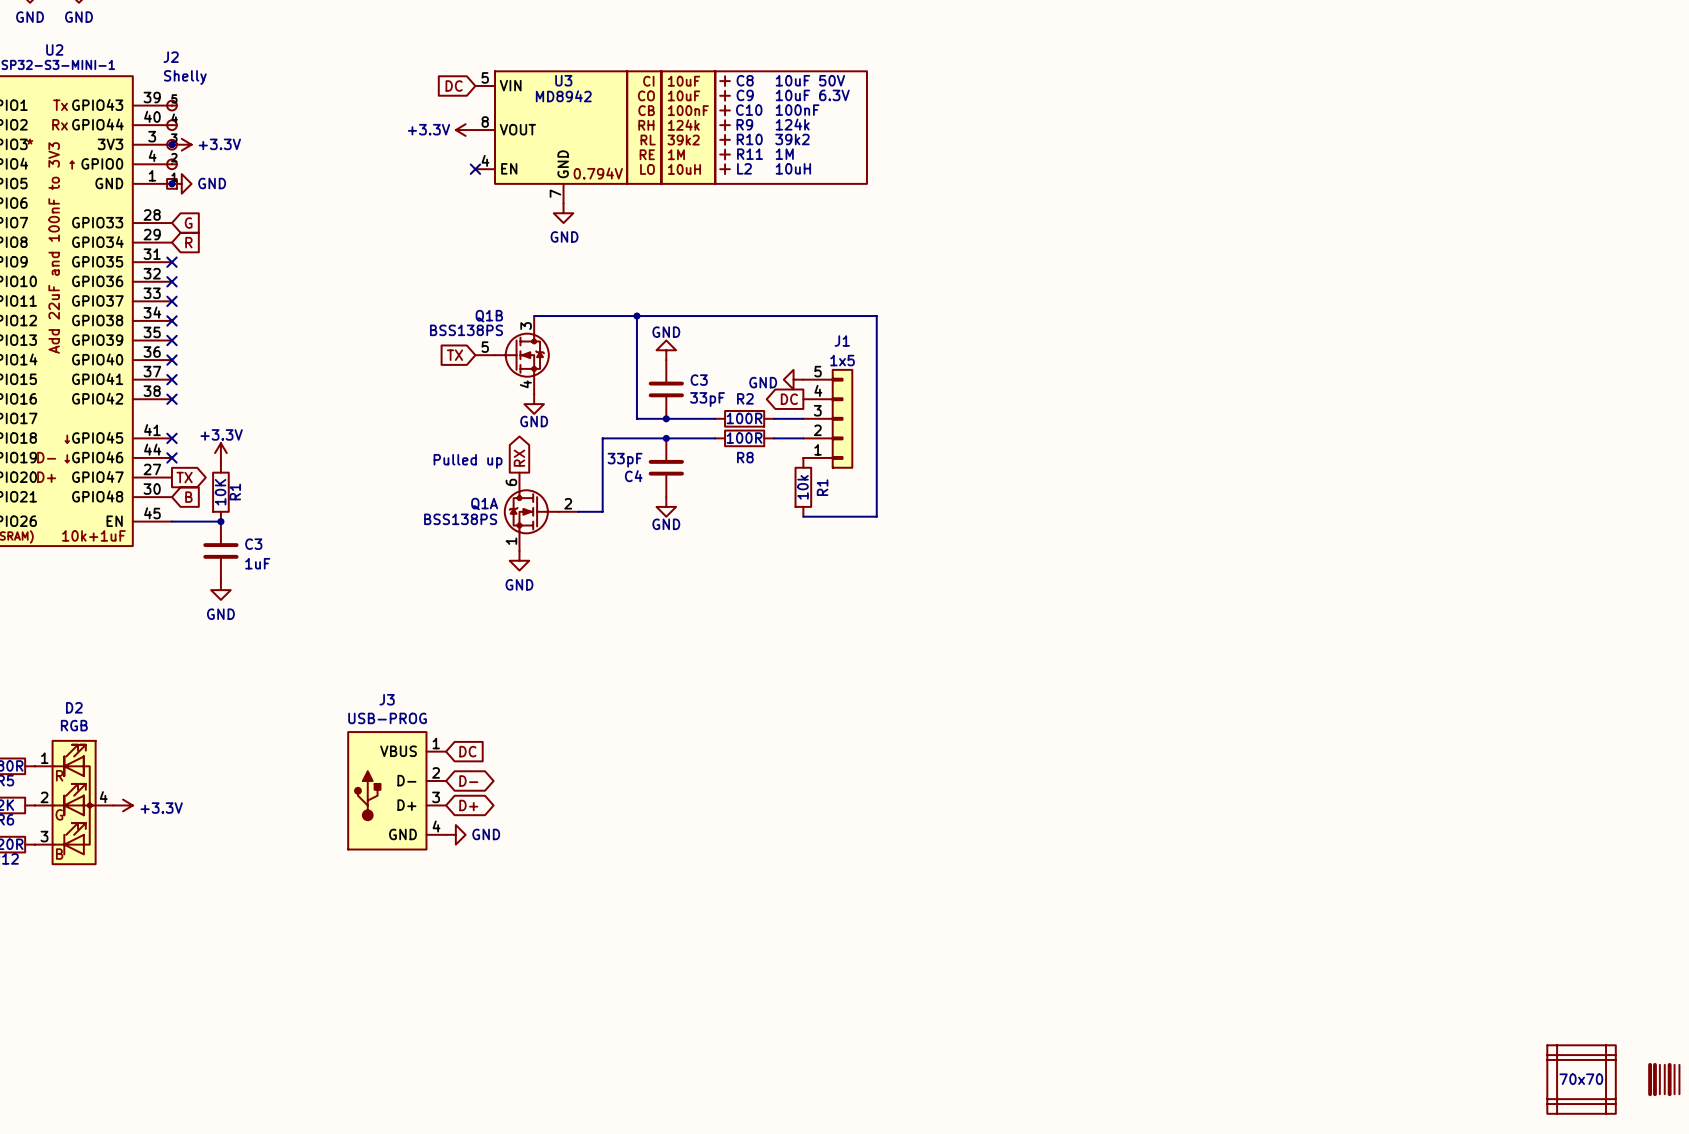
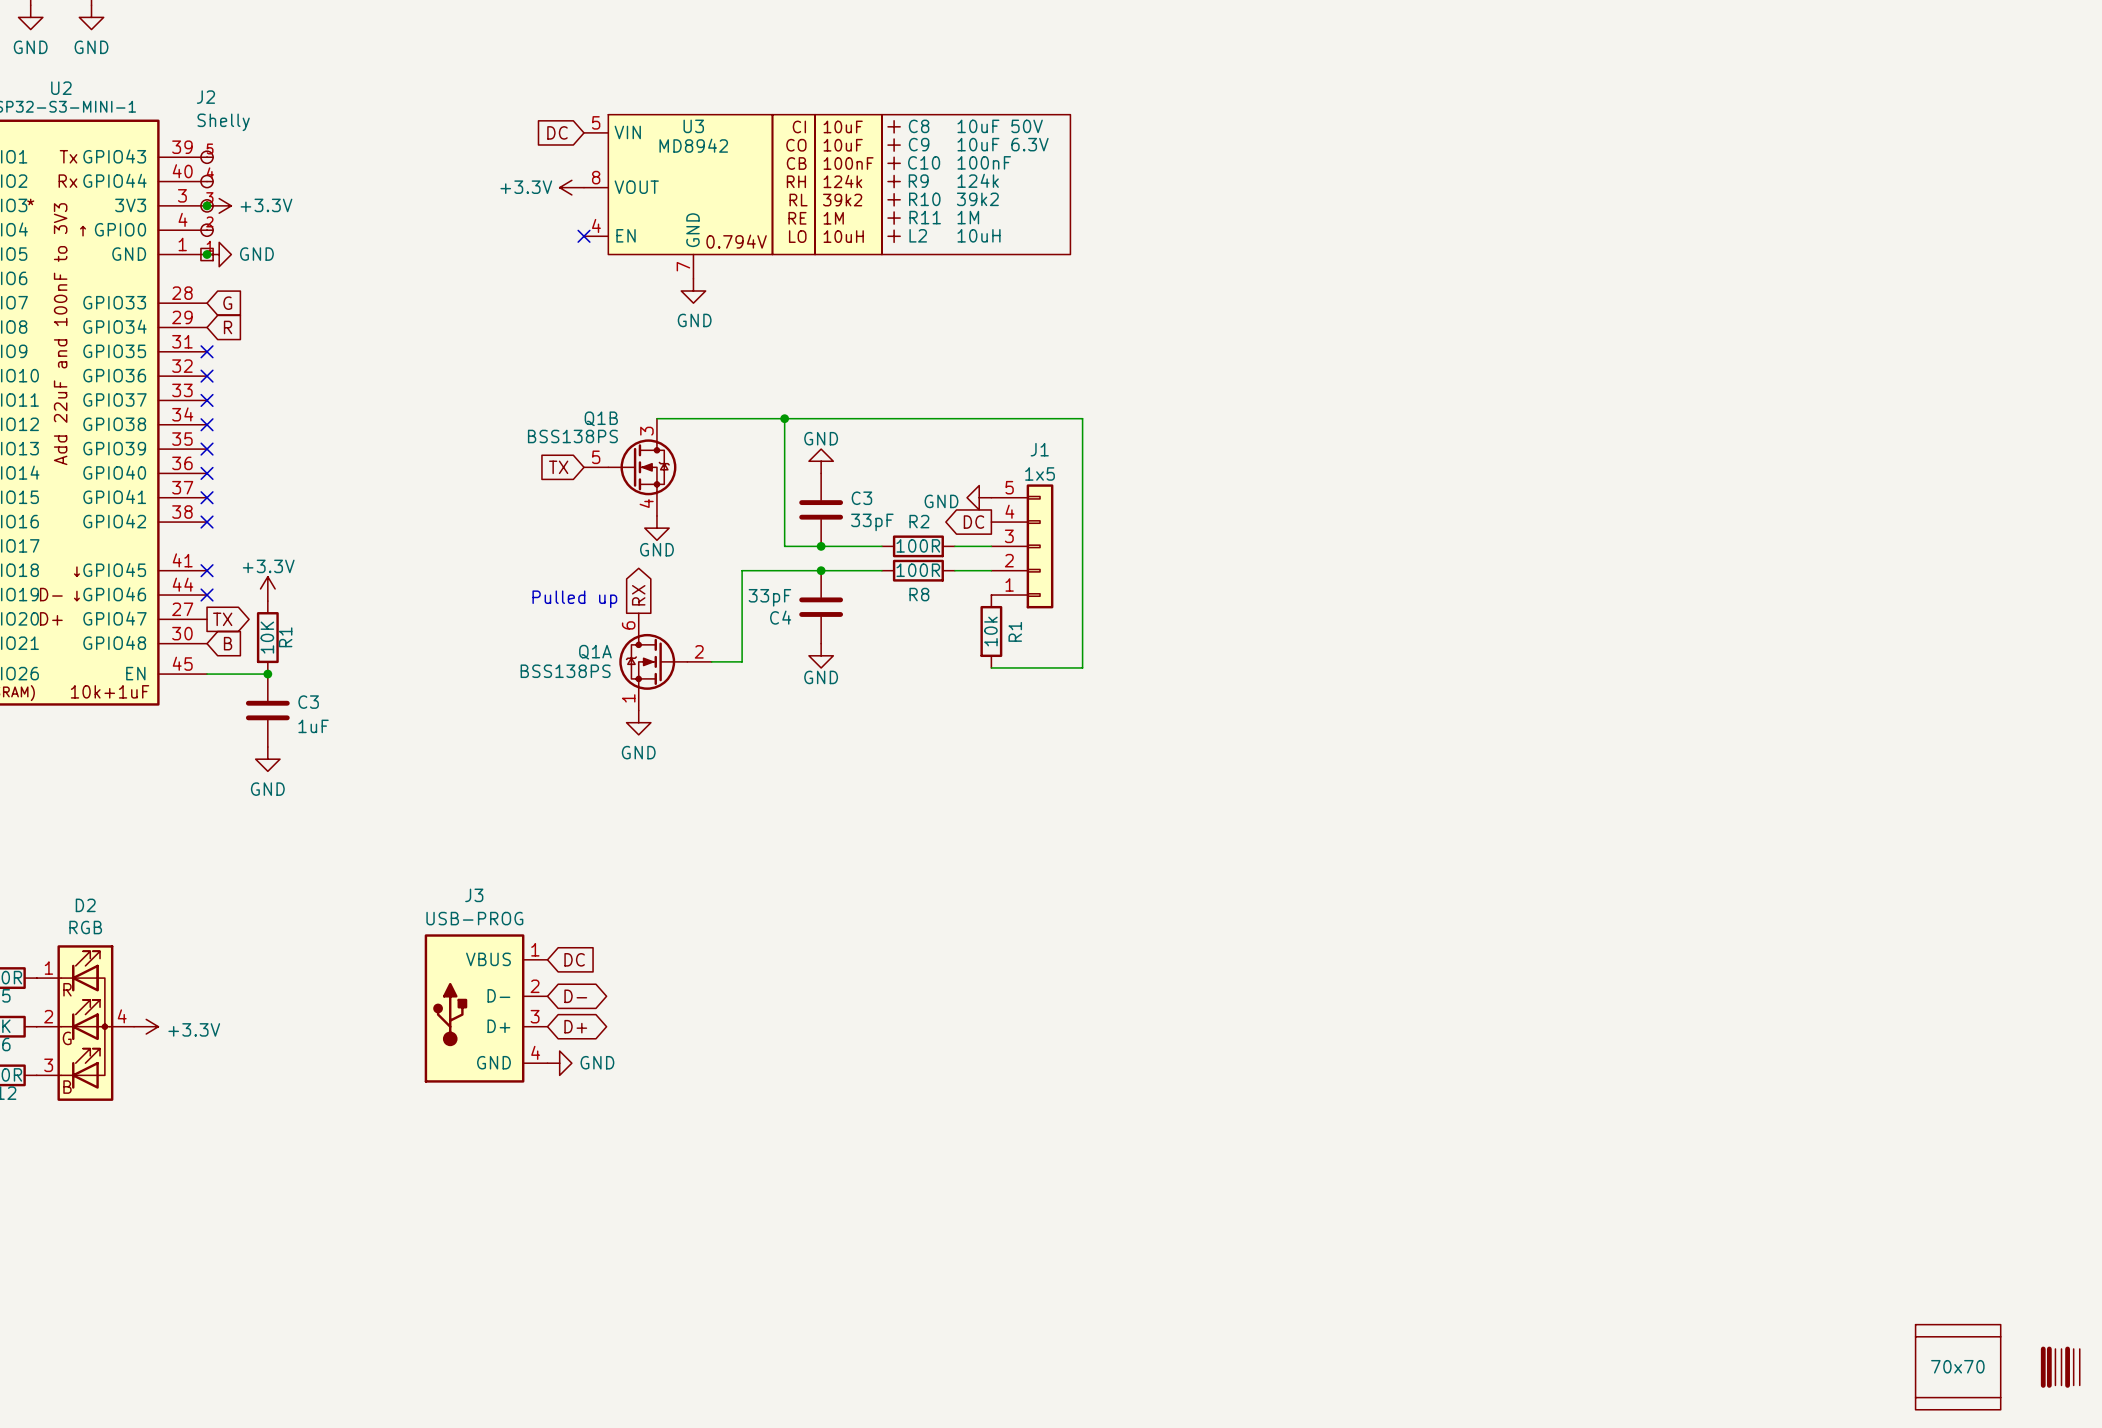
part: (1581, 1059) -> none
part: (1557, 1079) -> none
part: (1606, 1079) -> none
part: (1581, 1099) -> none

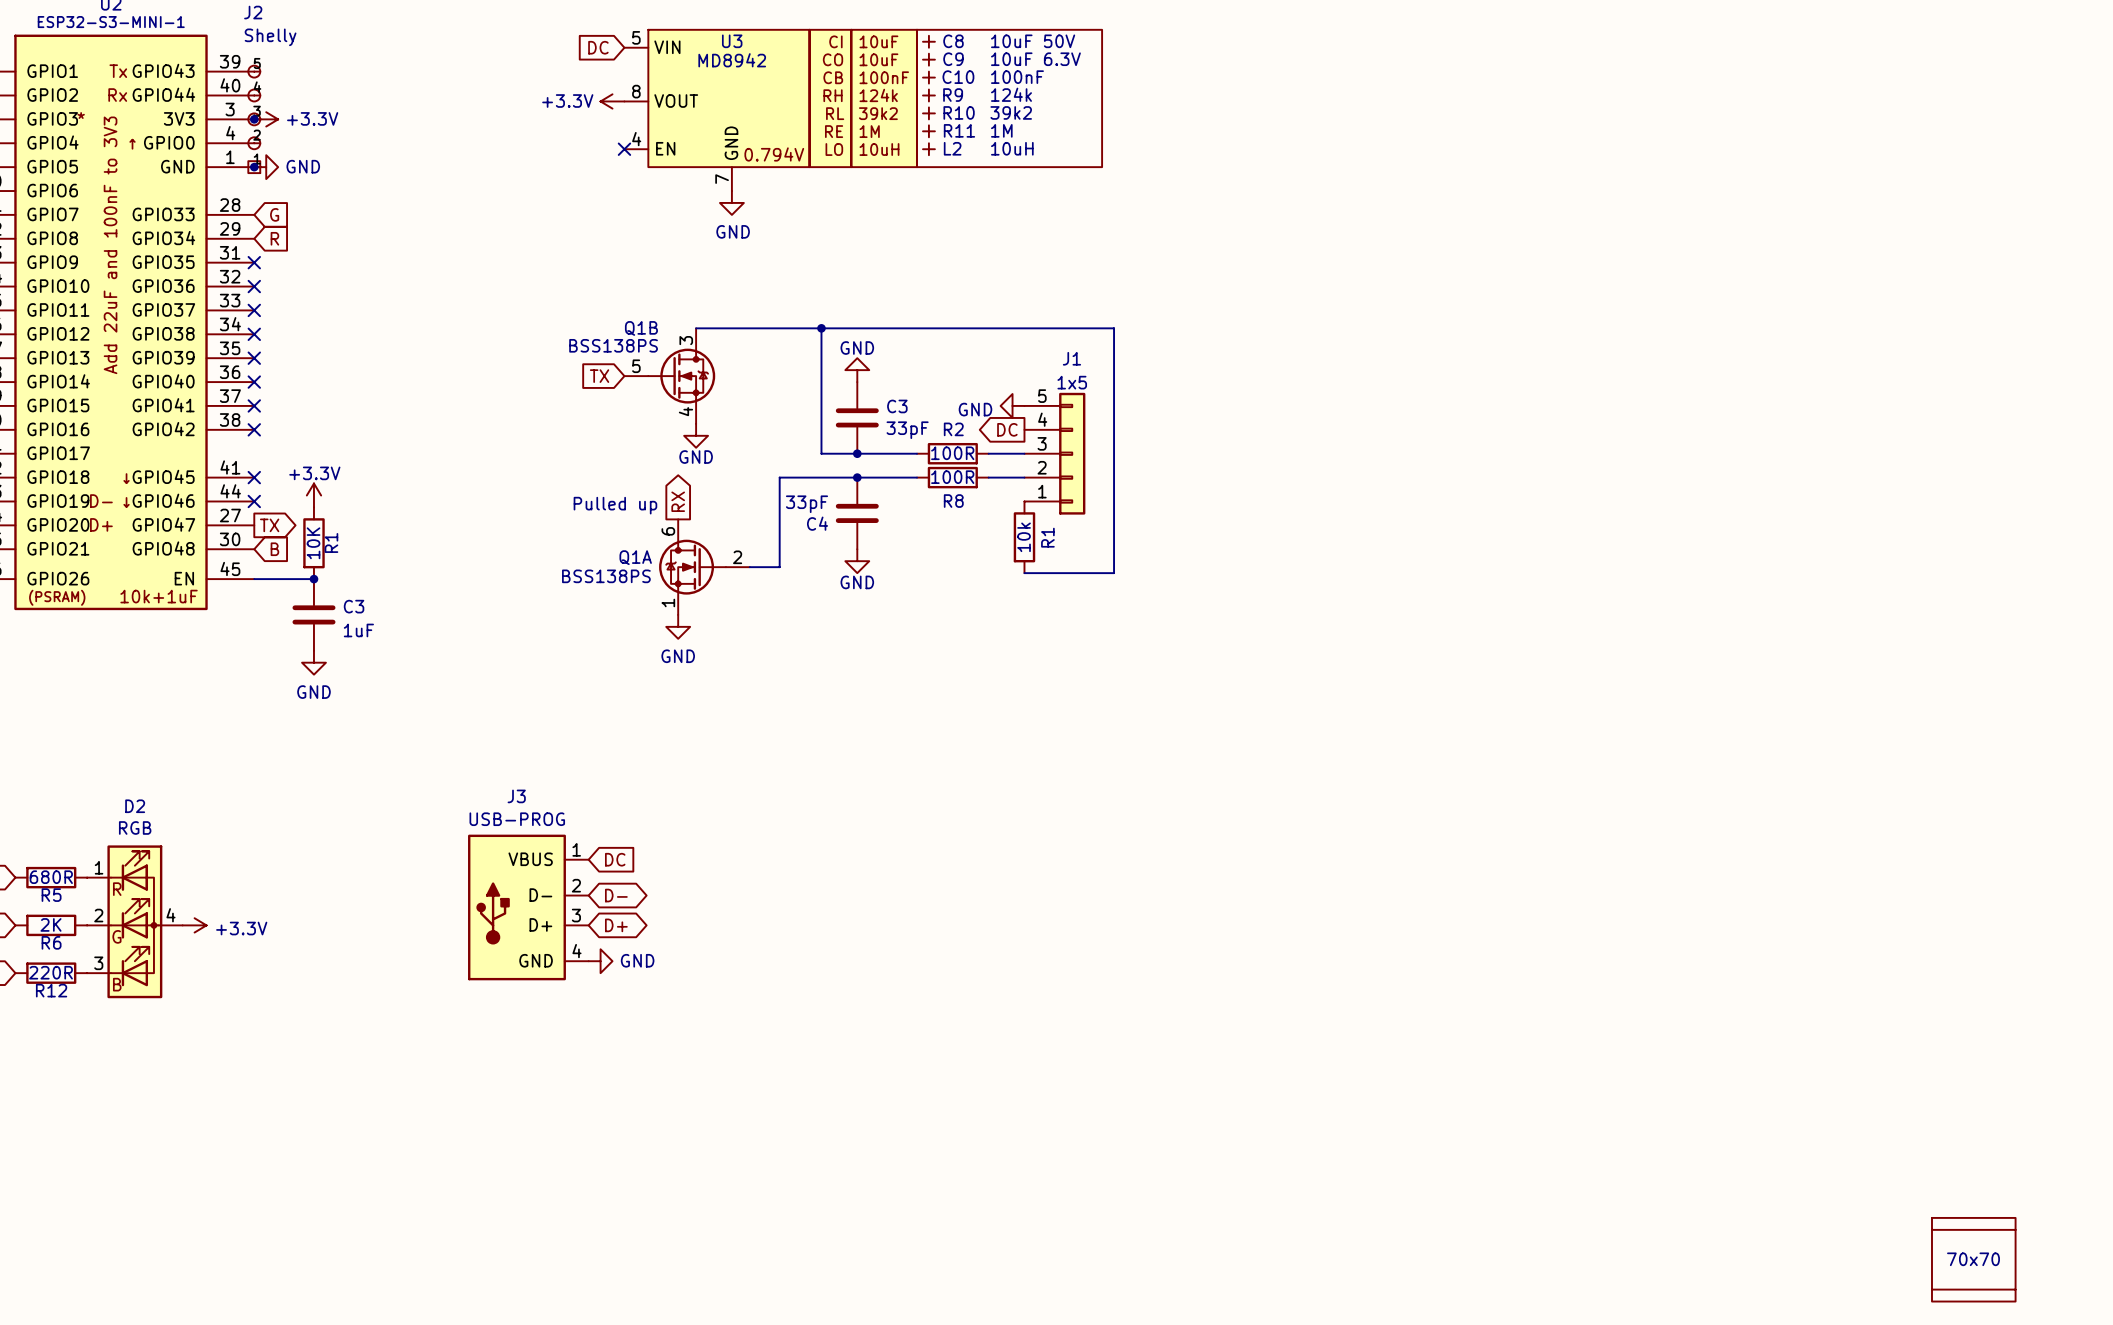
part: (2060, 1367) -> none

